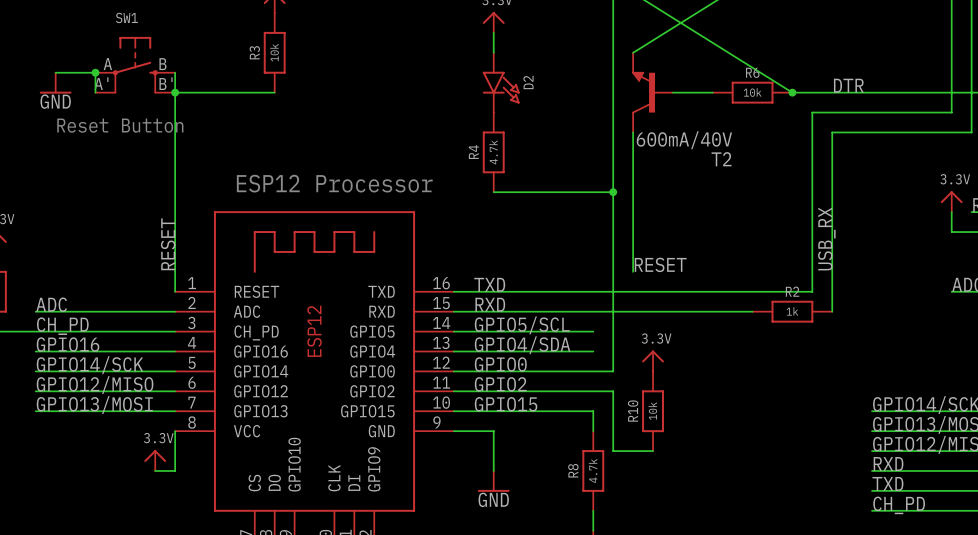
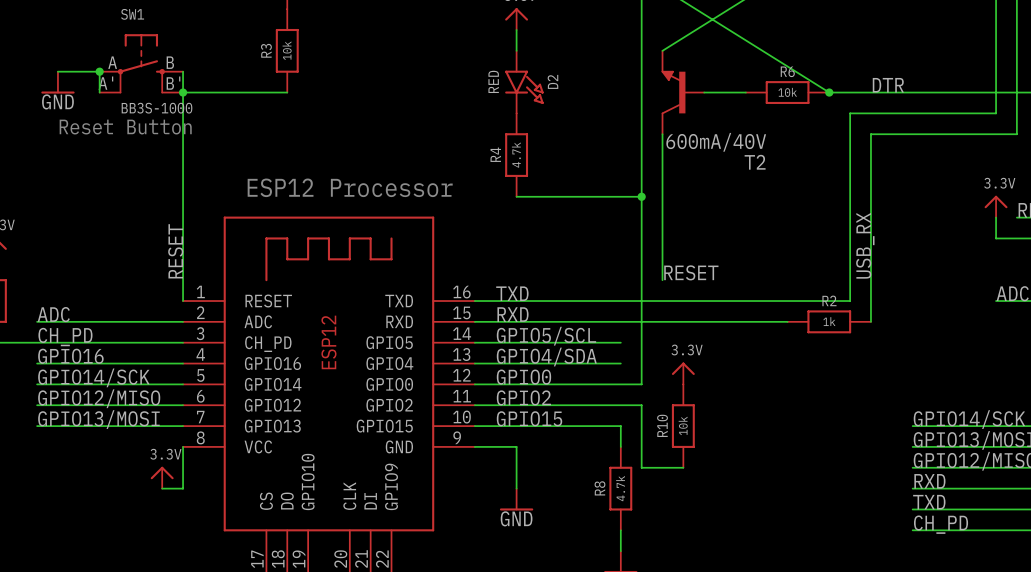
D2 value: none -> RED (493, 81)
SW1 value: none -> BB3S-1000 (157, 108)

